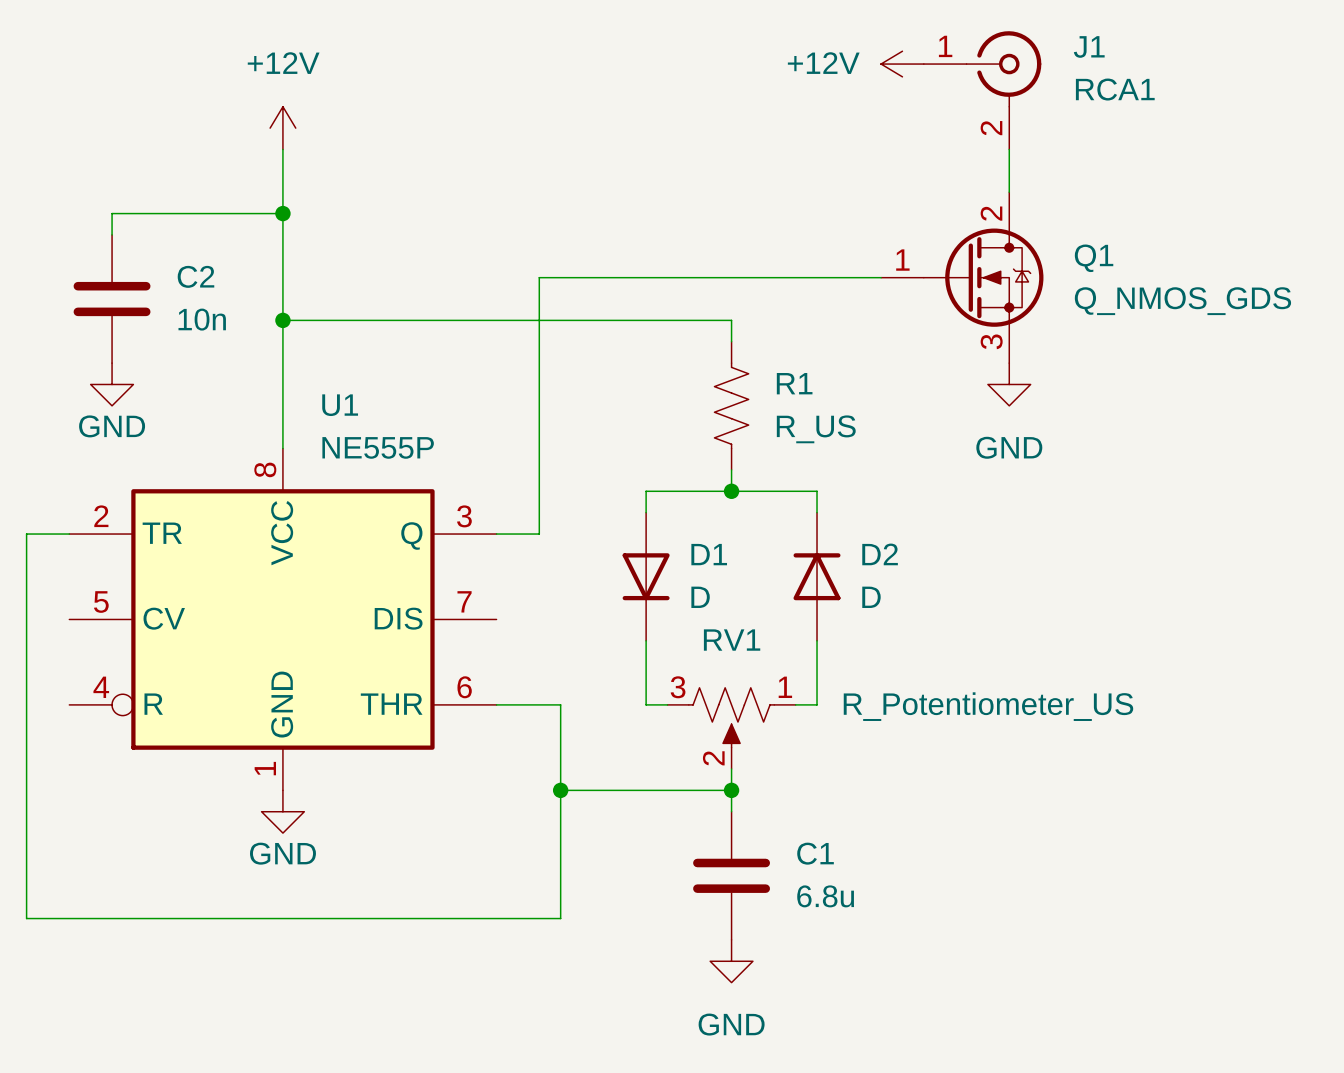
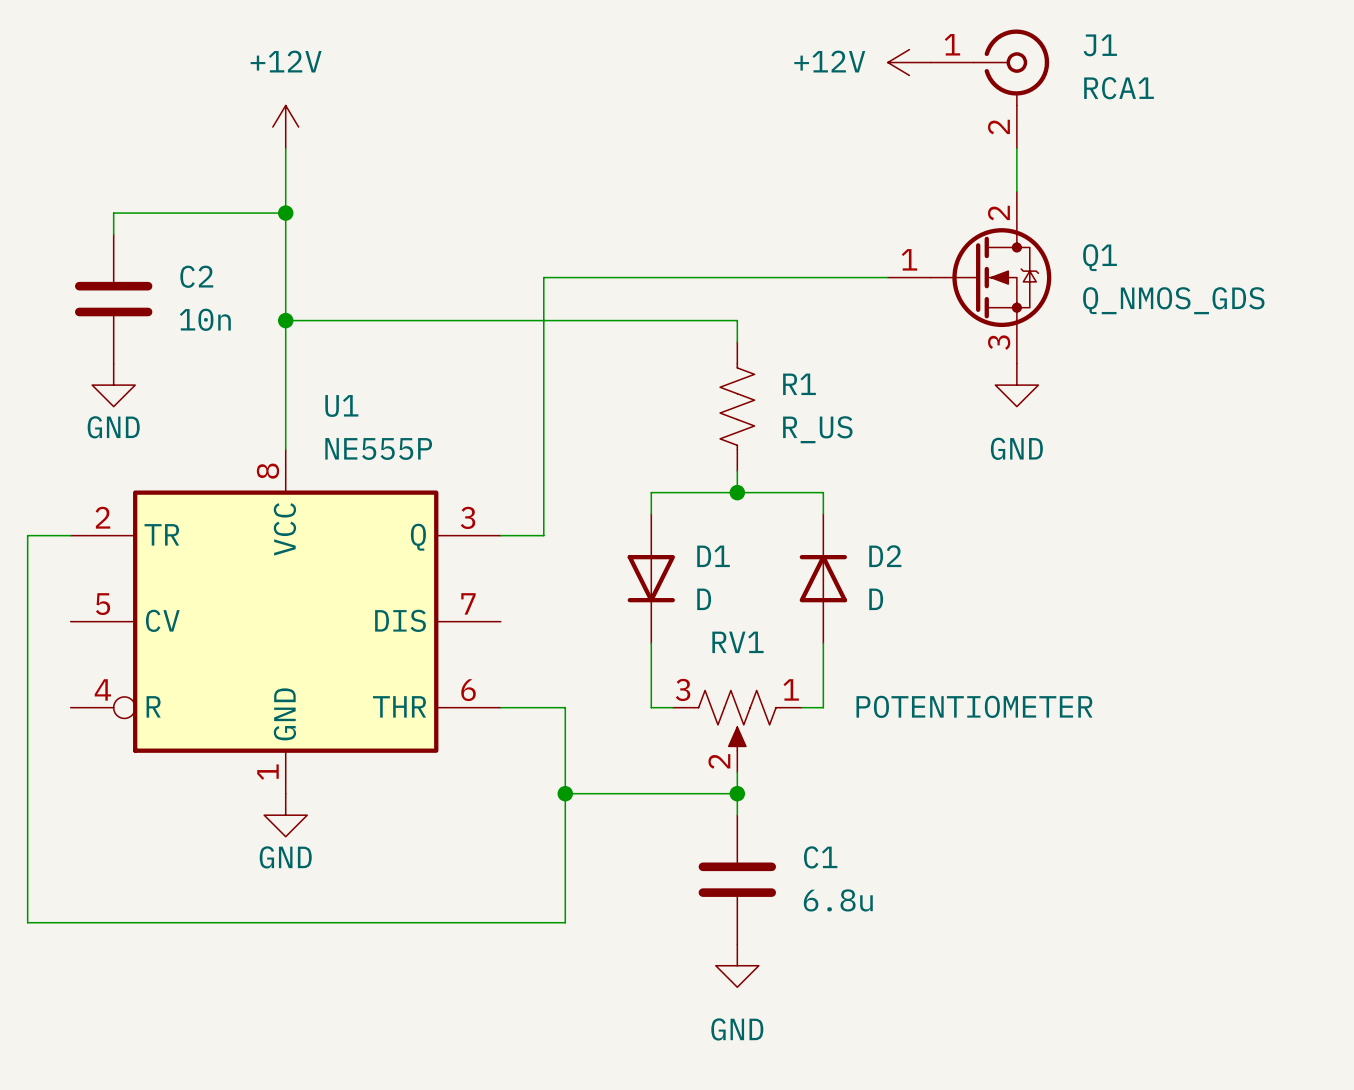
RV1 value: R_Potentiometer_US (988, 706) -> POTENTIOMETER (974, 706)

